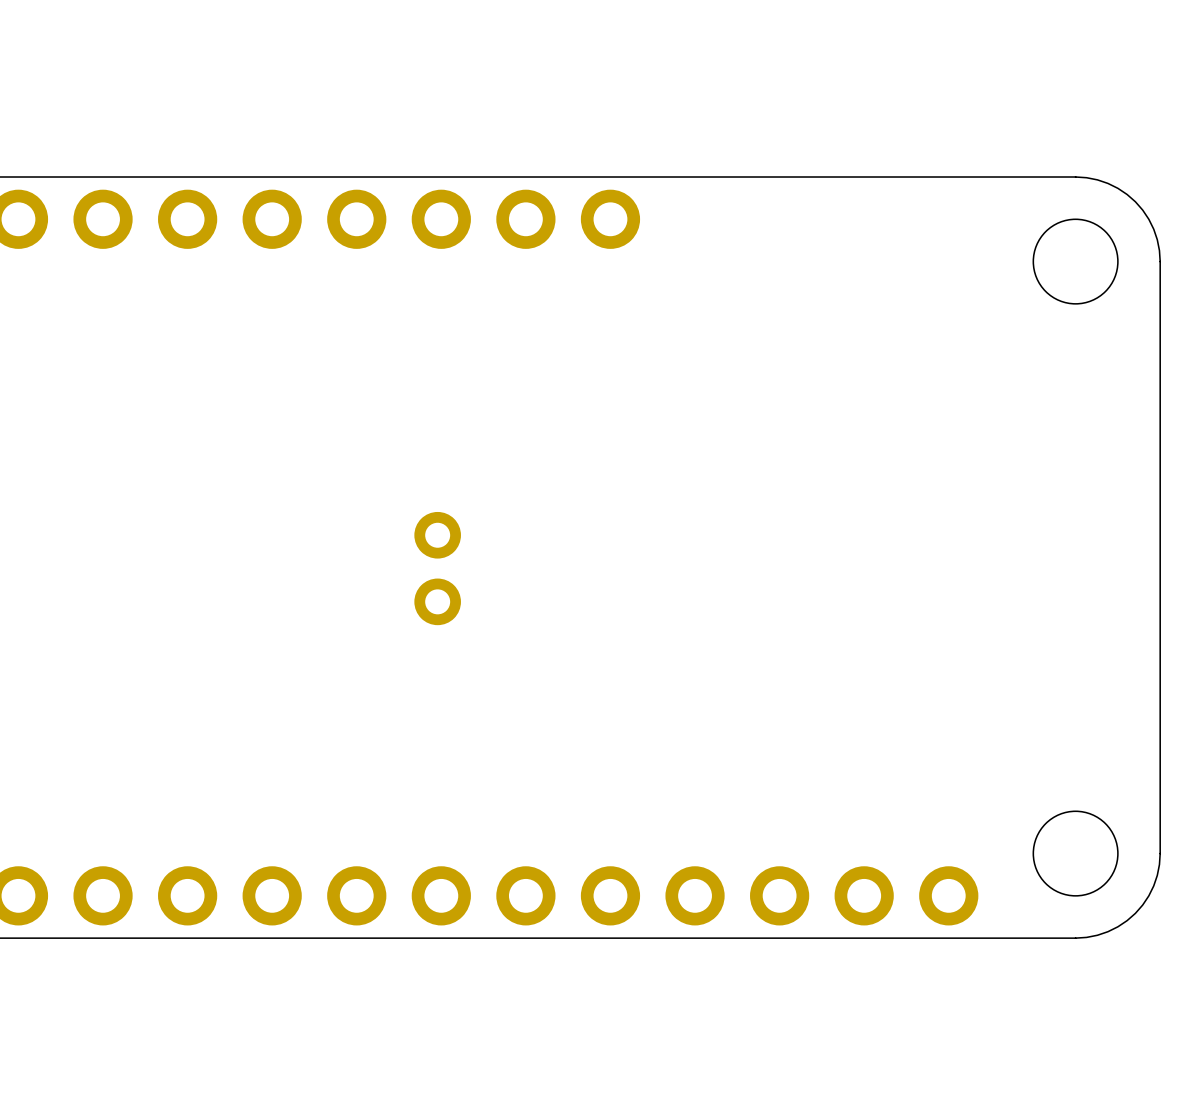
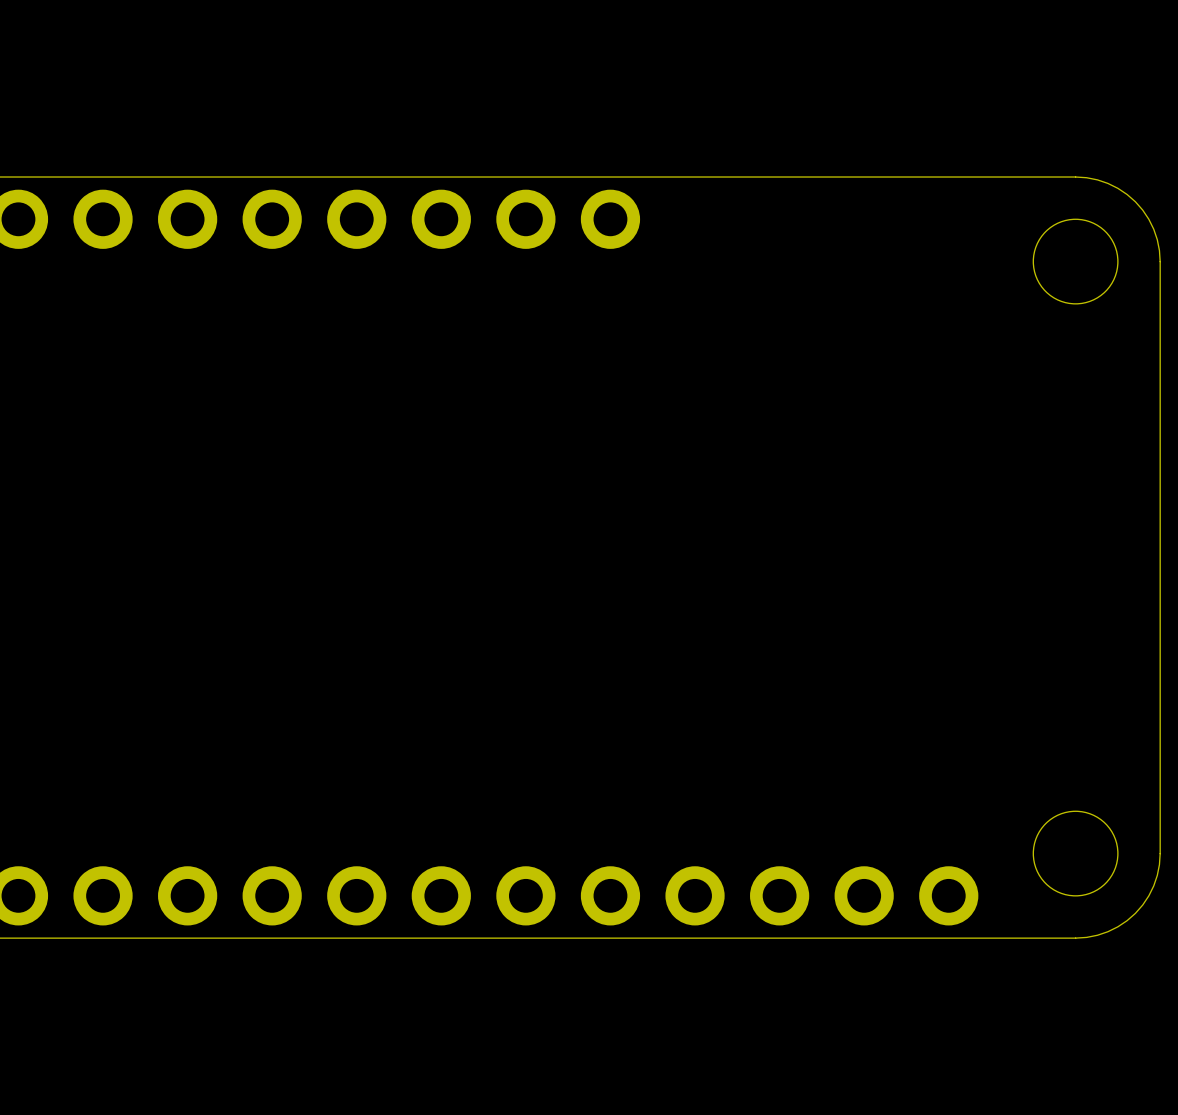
part: (437, 568) -> none

